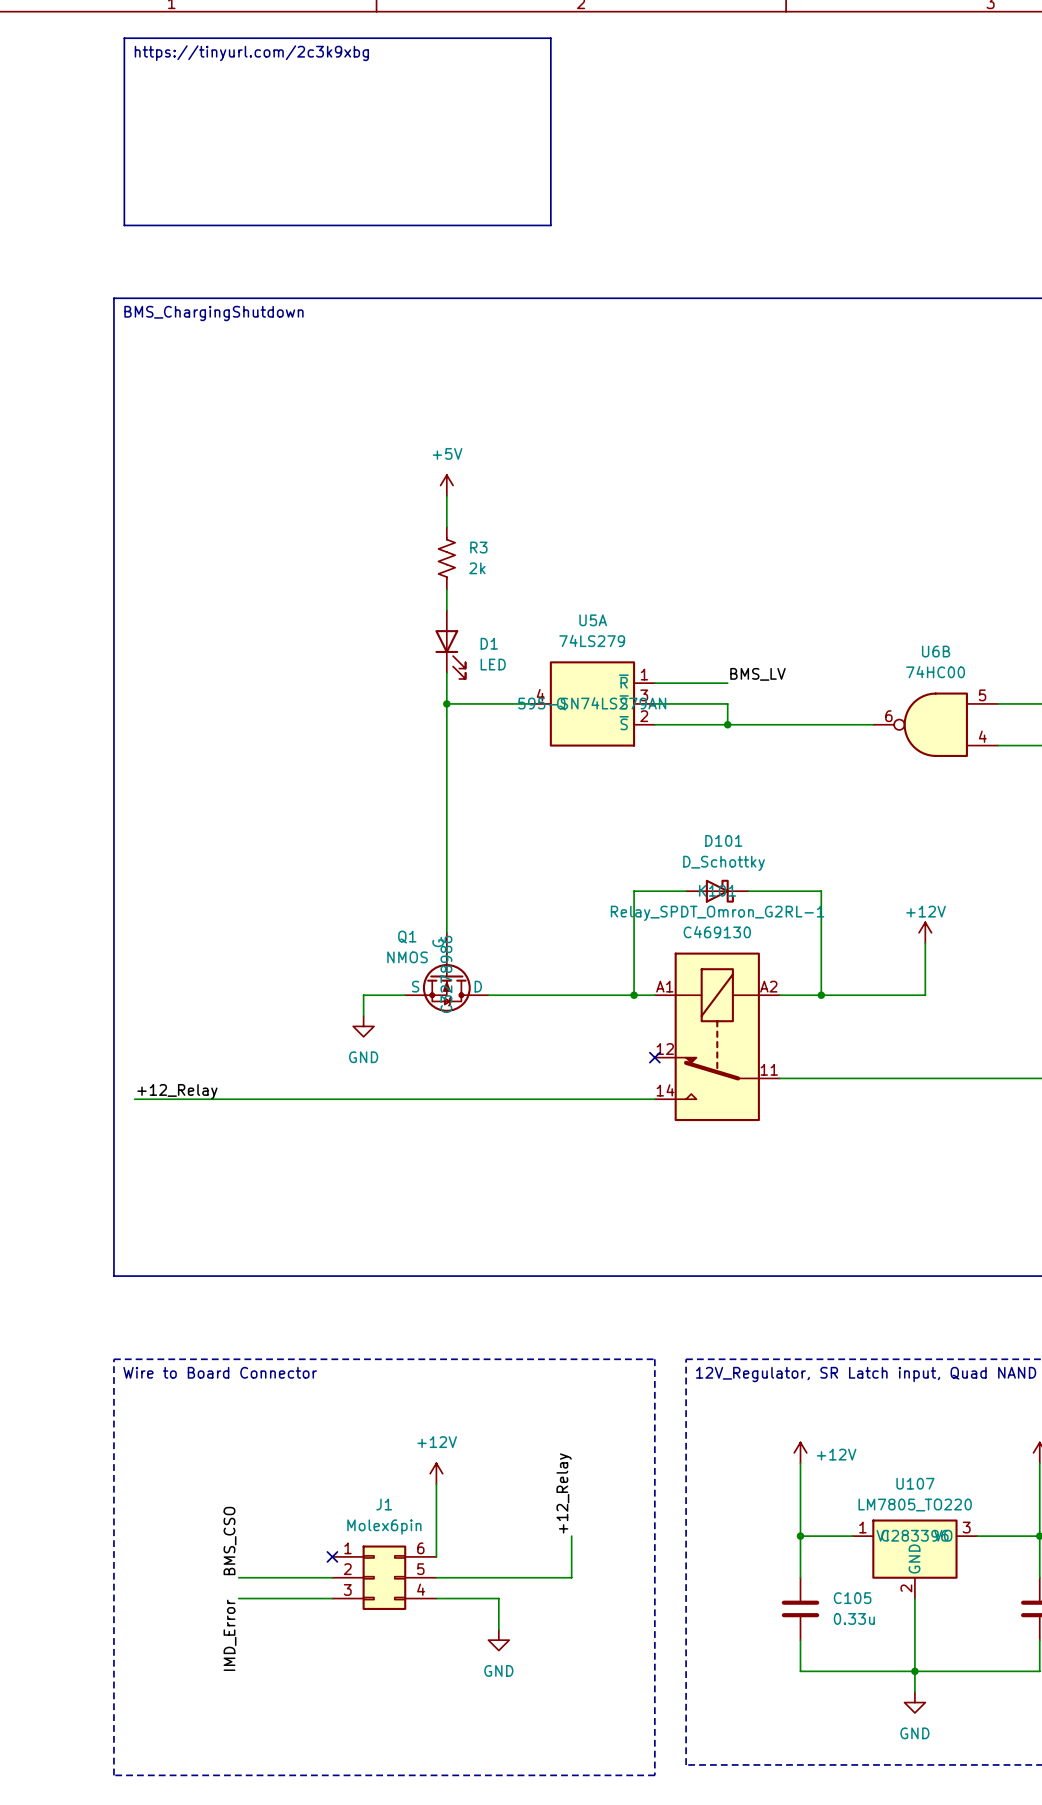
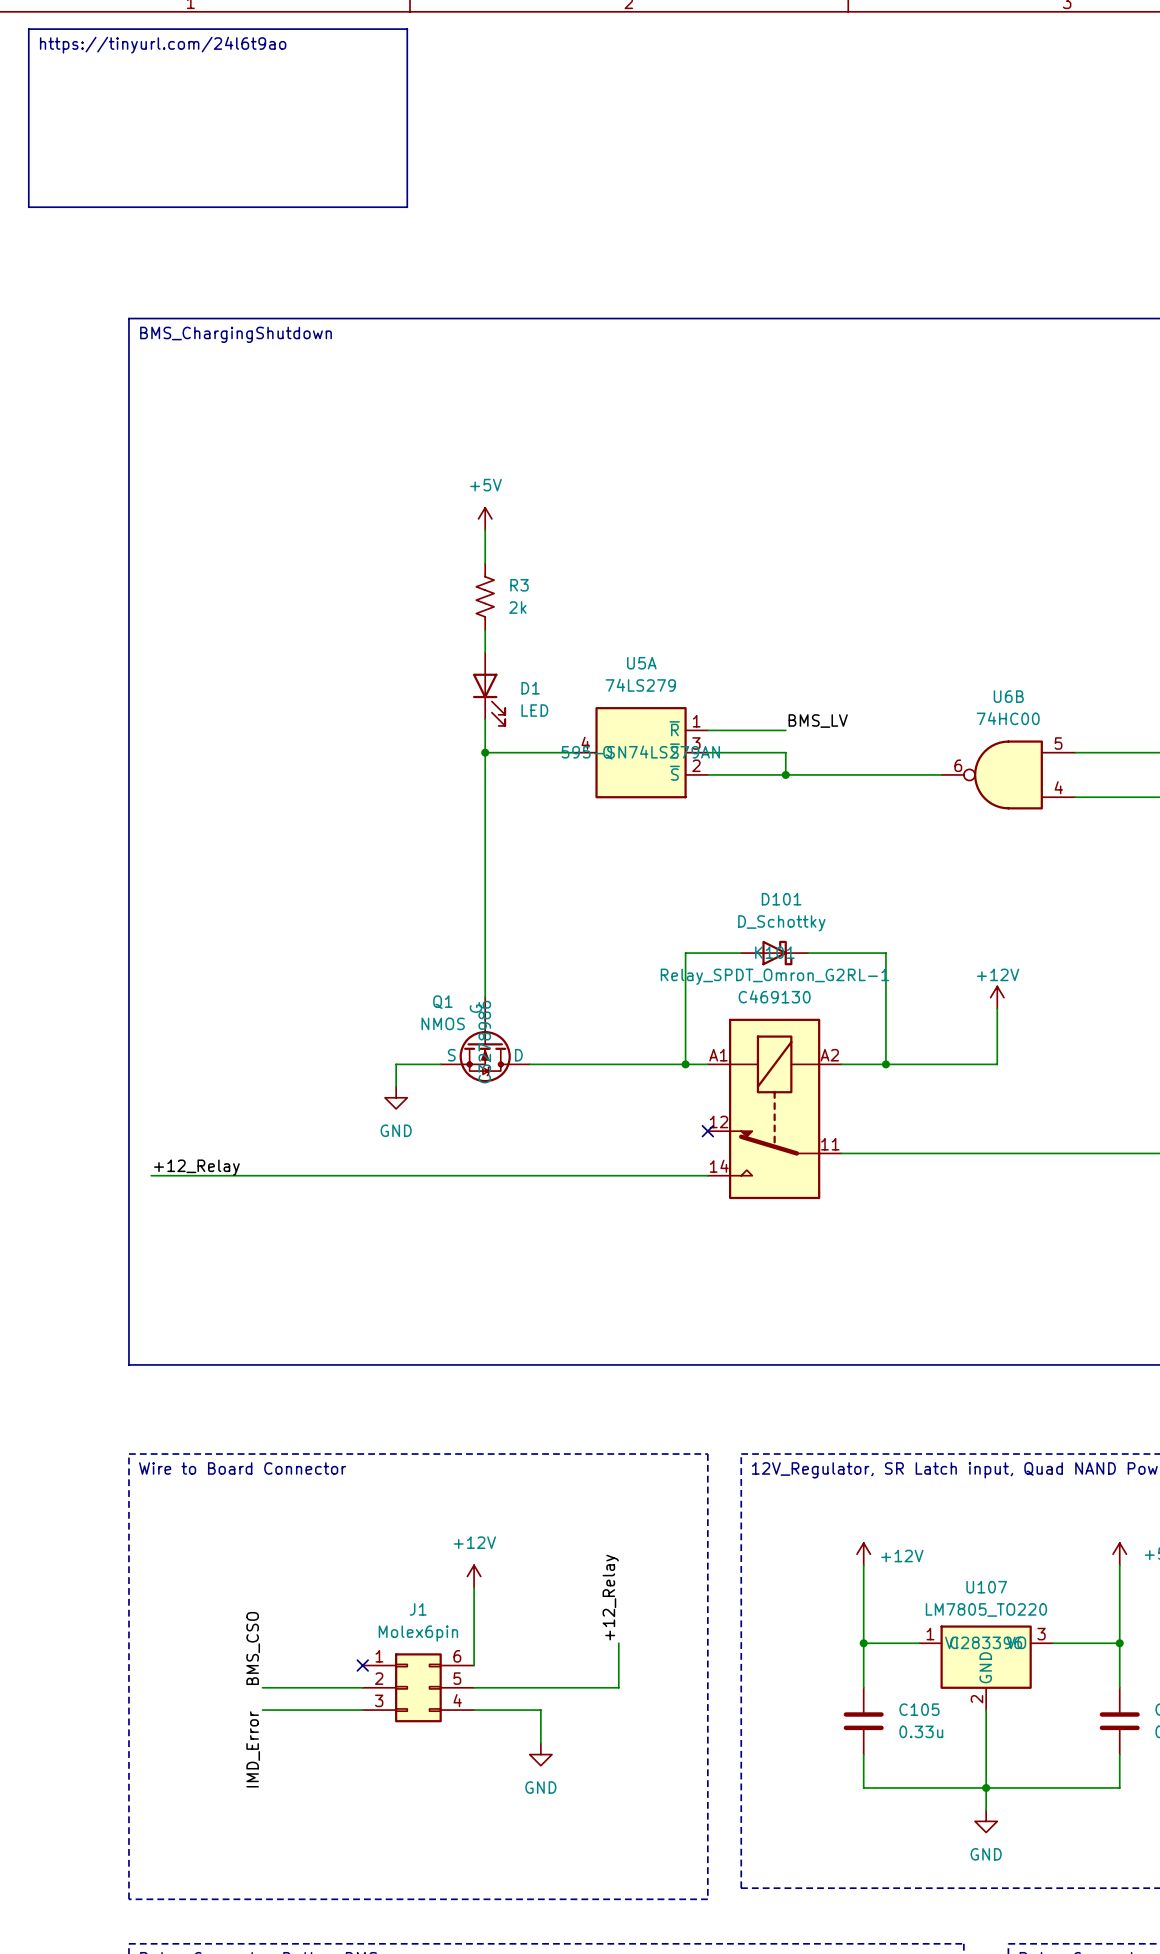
line: none -> (28, 29) (407, 29) (407, 207) (28, 207) (28, 29)
line: (124, 38) (550, 38) (550, 225) (124, 225) (124, 38) -> none
text: https://tinyurl.com/2c3k9xbg (251, 53) -> https://tinyurl.com/24l6t9ao (163, 45)

